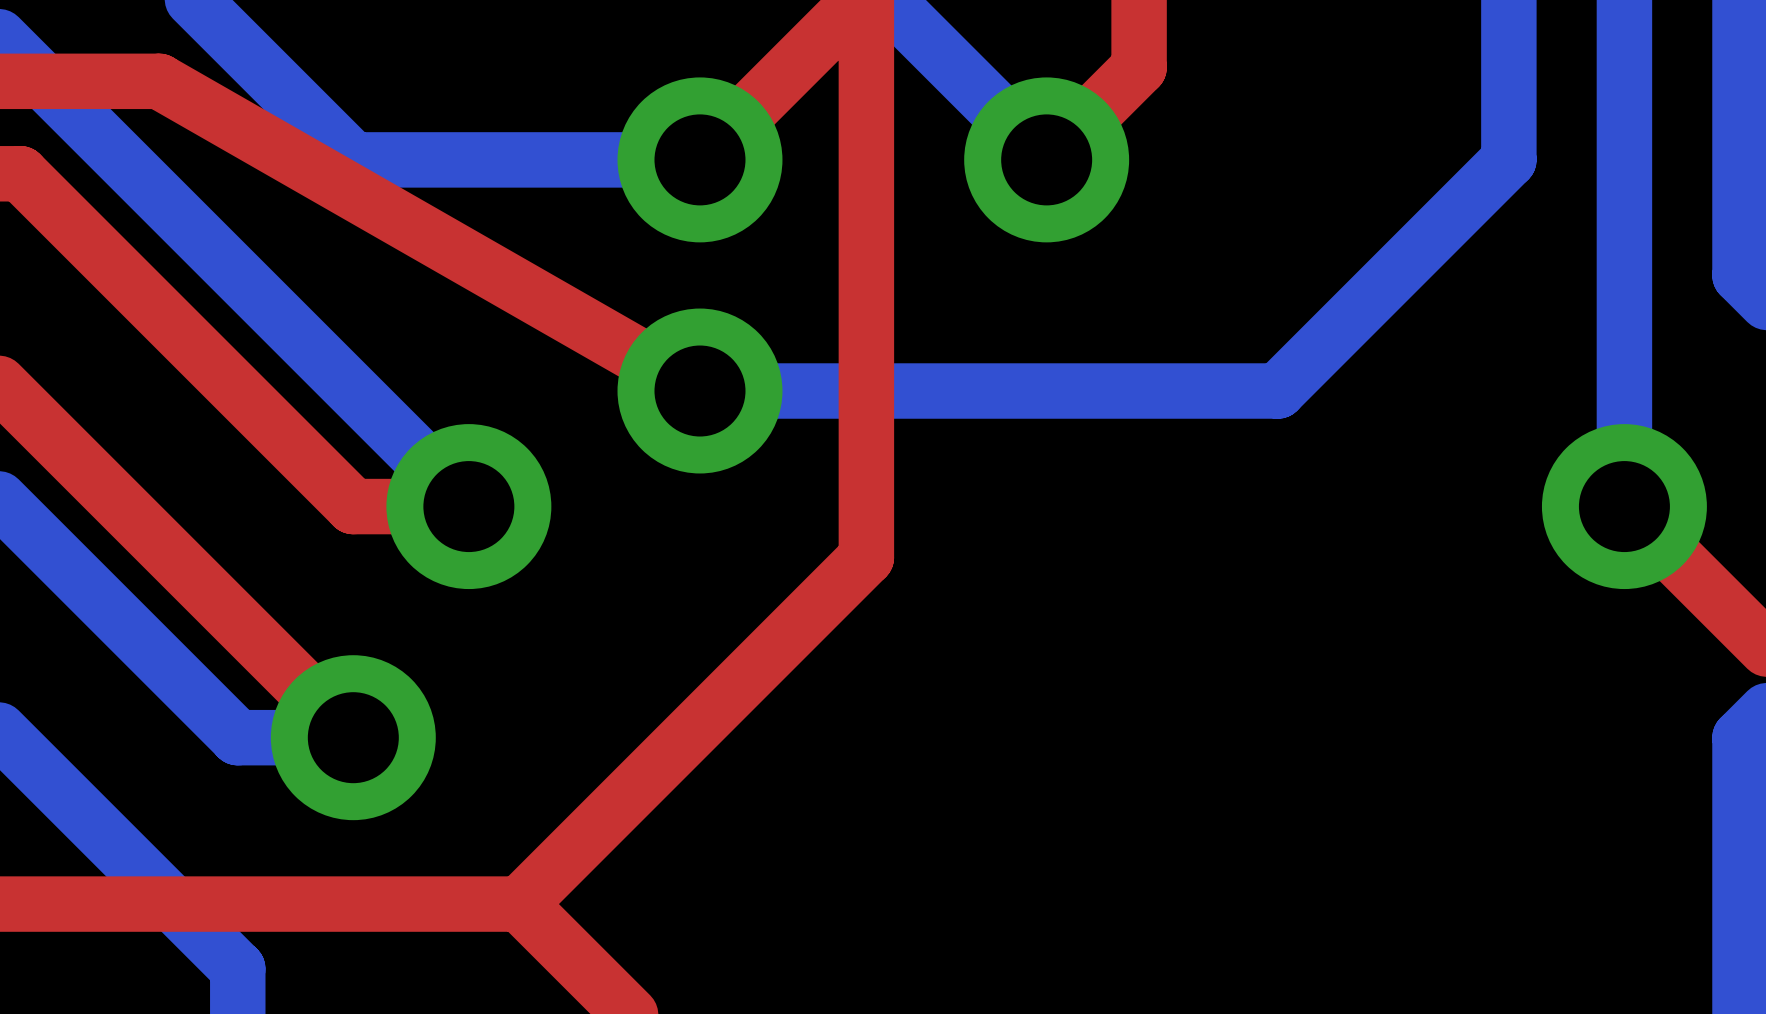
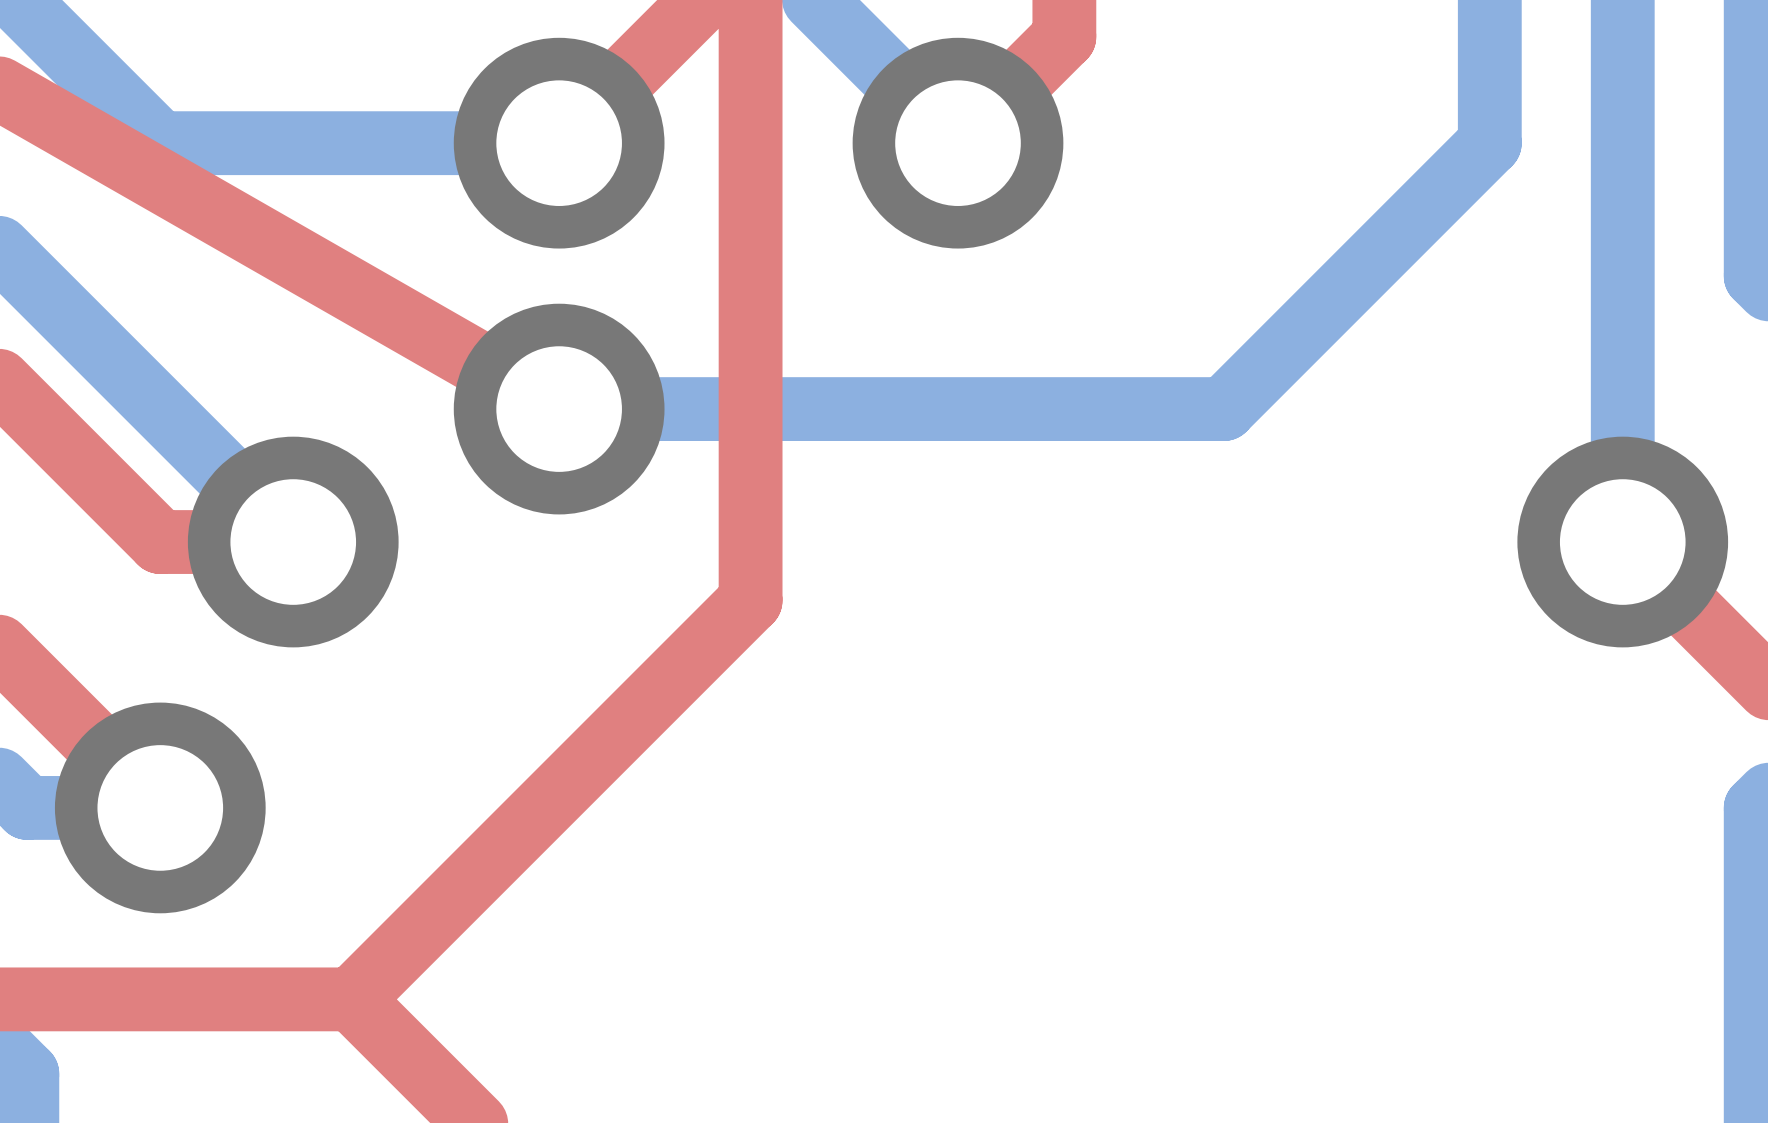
via size: [617, 77, 783, 243] -> [453, 37, 665, 249]
via size: [964, 77, 1130, 243] -> [852, 37, 1064, 249]
via size: [617, 308, 783, 474] -> [453, 303, 665, 515]
via size: [386, 424, 552, 590] -> [187, 436, 399, 648]
via size: [1541, 424, 1707, 590] -> [1517, 436, 1729, 648]
via size: [270, 655, 436, 821] -> [54, 702, 266, 914]

